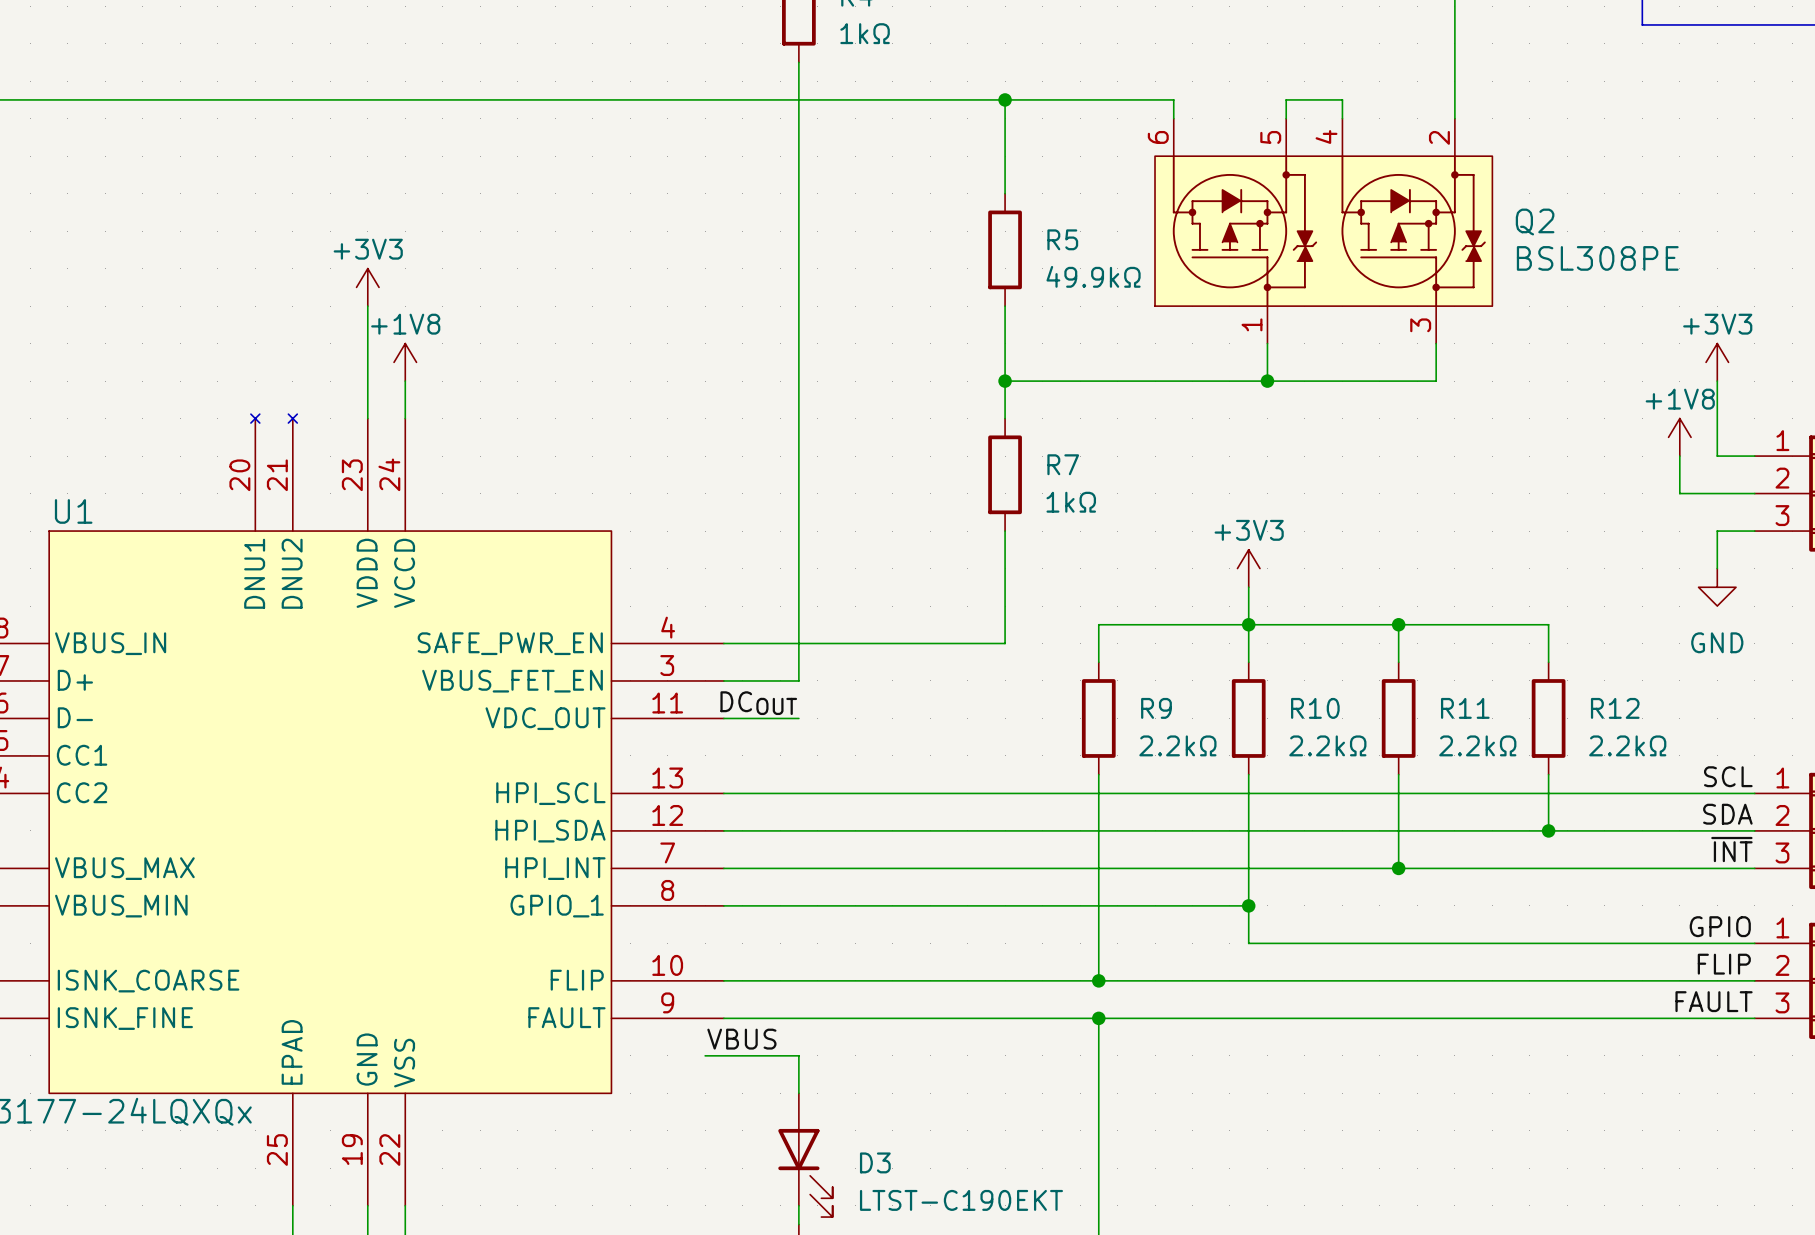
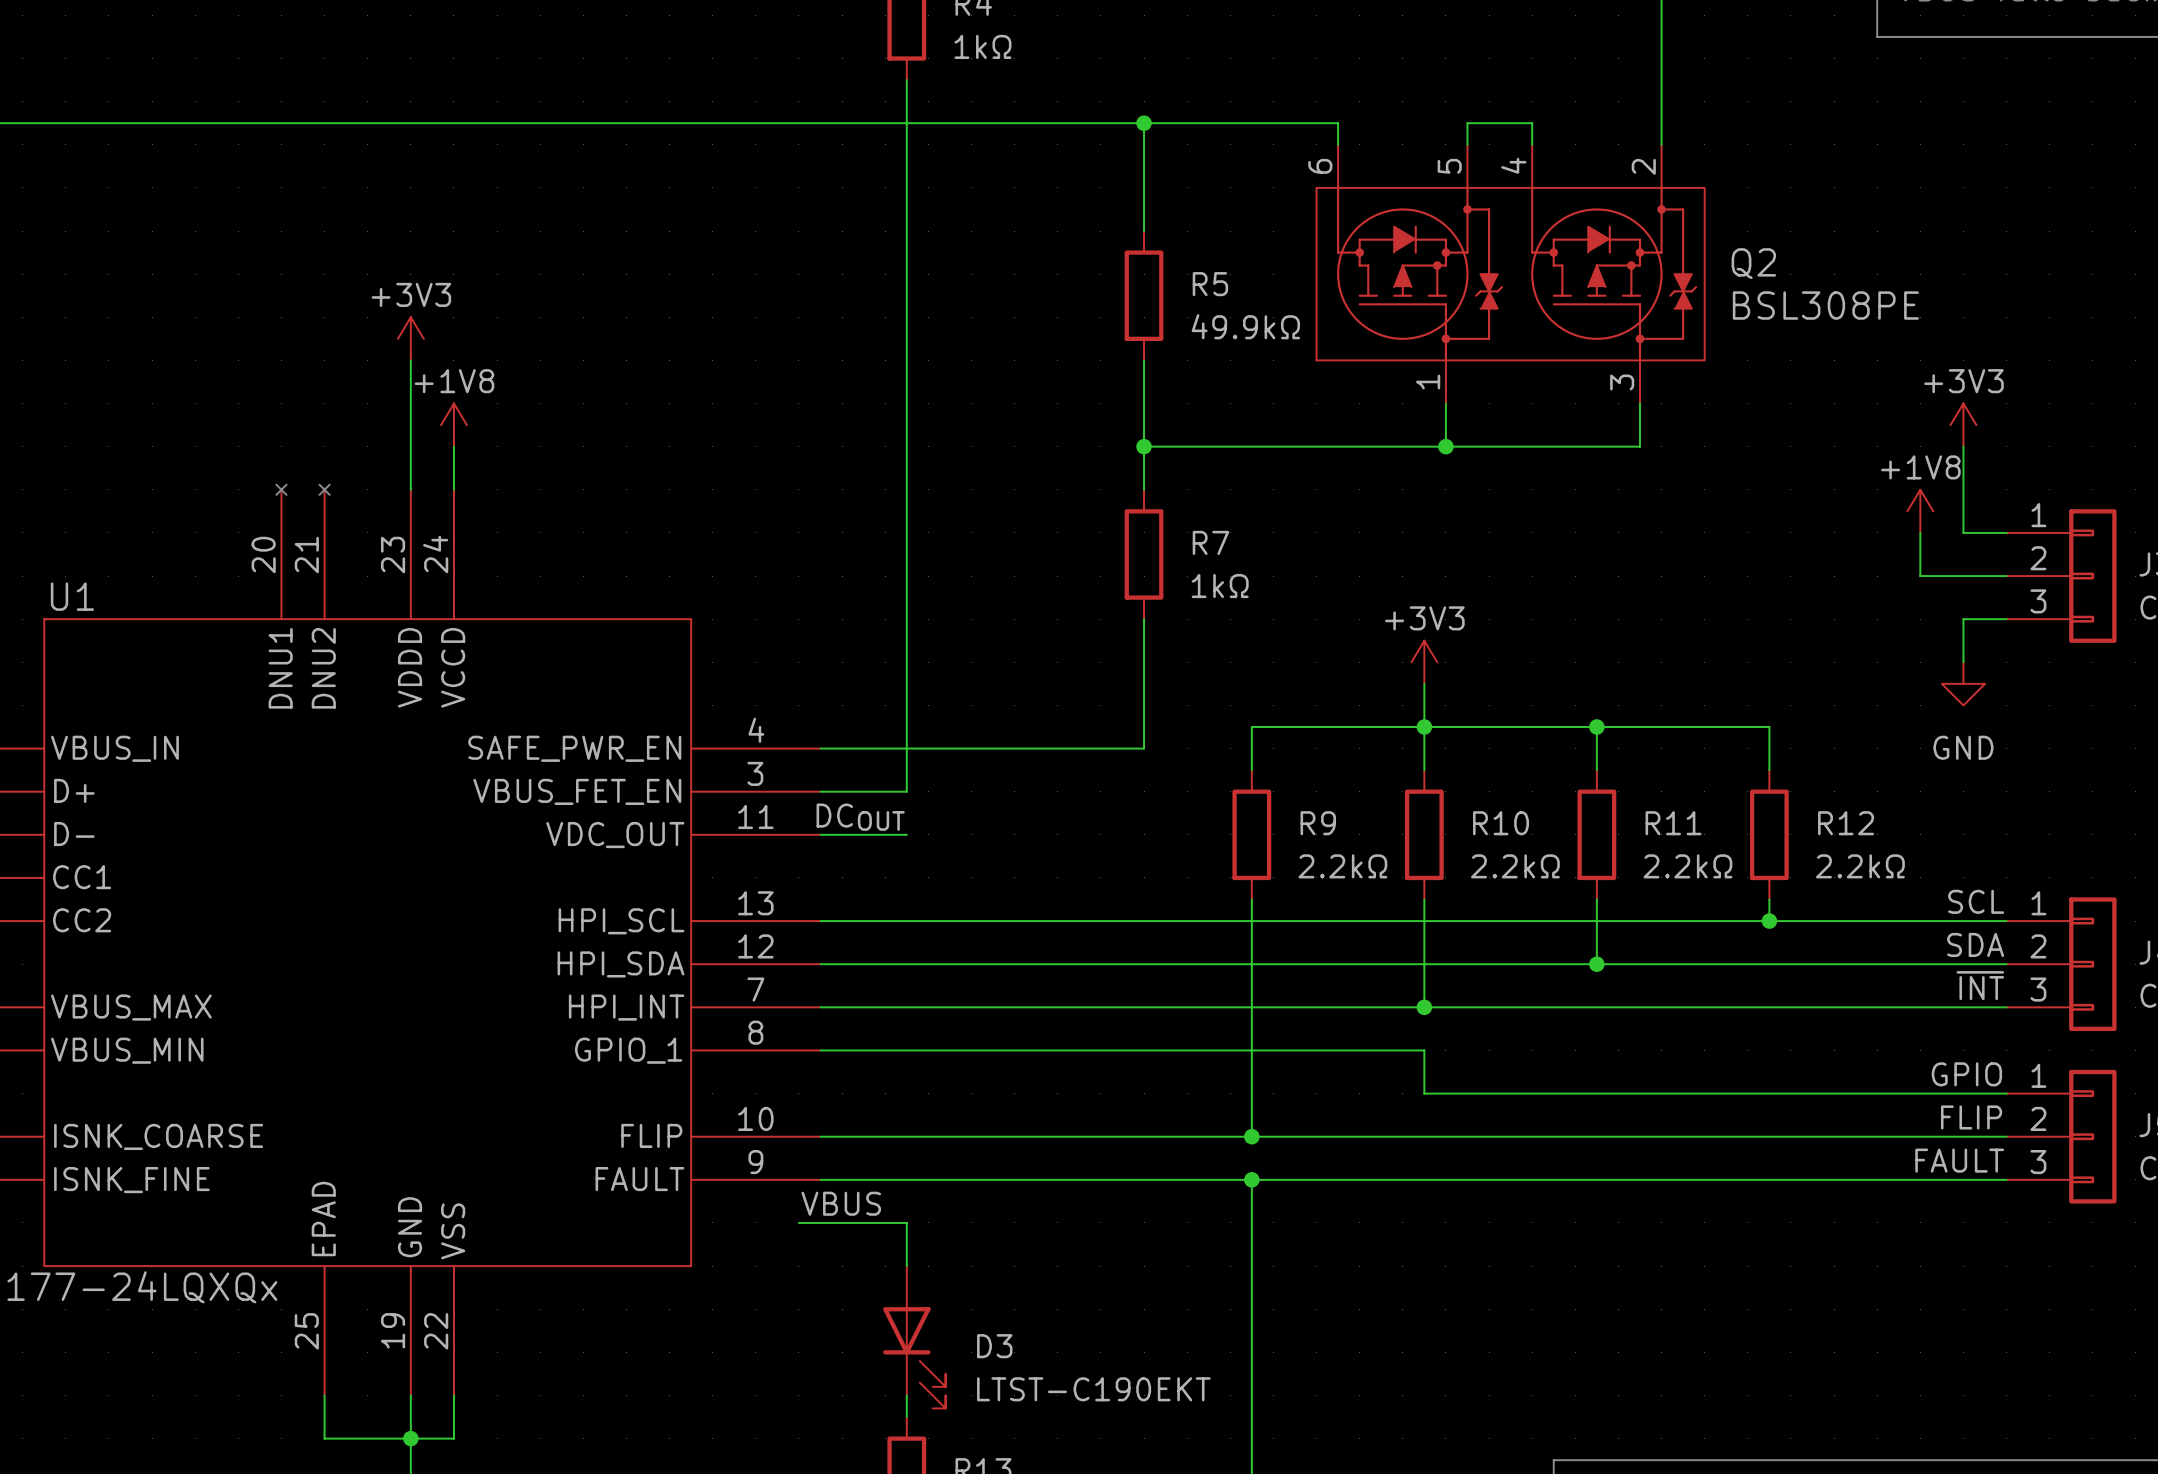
wire: (1548, 793) (1548, 830) -> none
wire: (1398, 830) (1398, 868) -> none
junction position: (1548, 830) -> (1769, 921)
wire: (1248, 868) (1248, 905) -> none
junction position: (1398, 868) -> (1596, 964)
junction position: (1248, 905) -> (1424, 1007)

